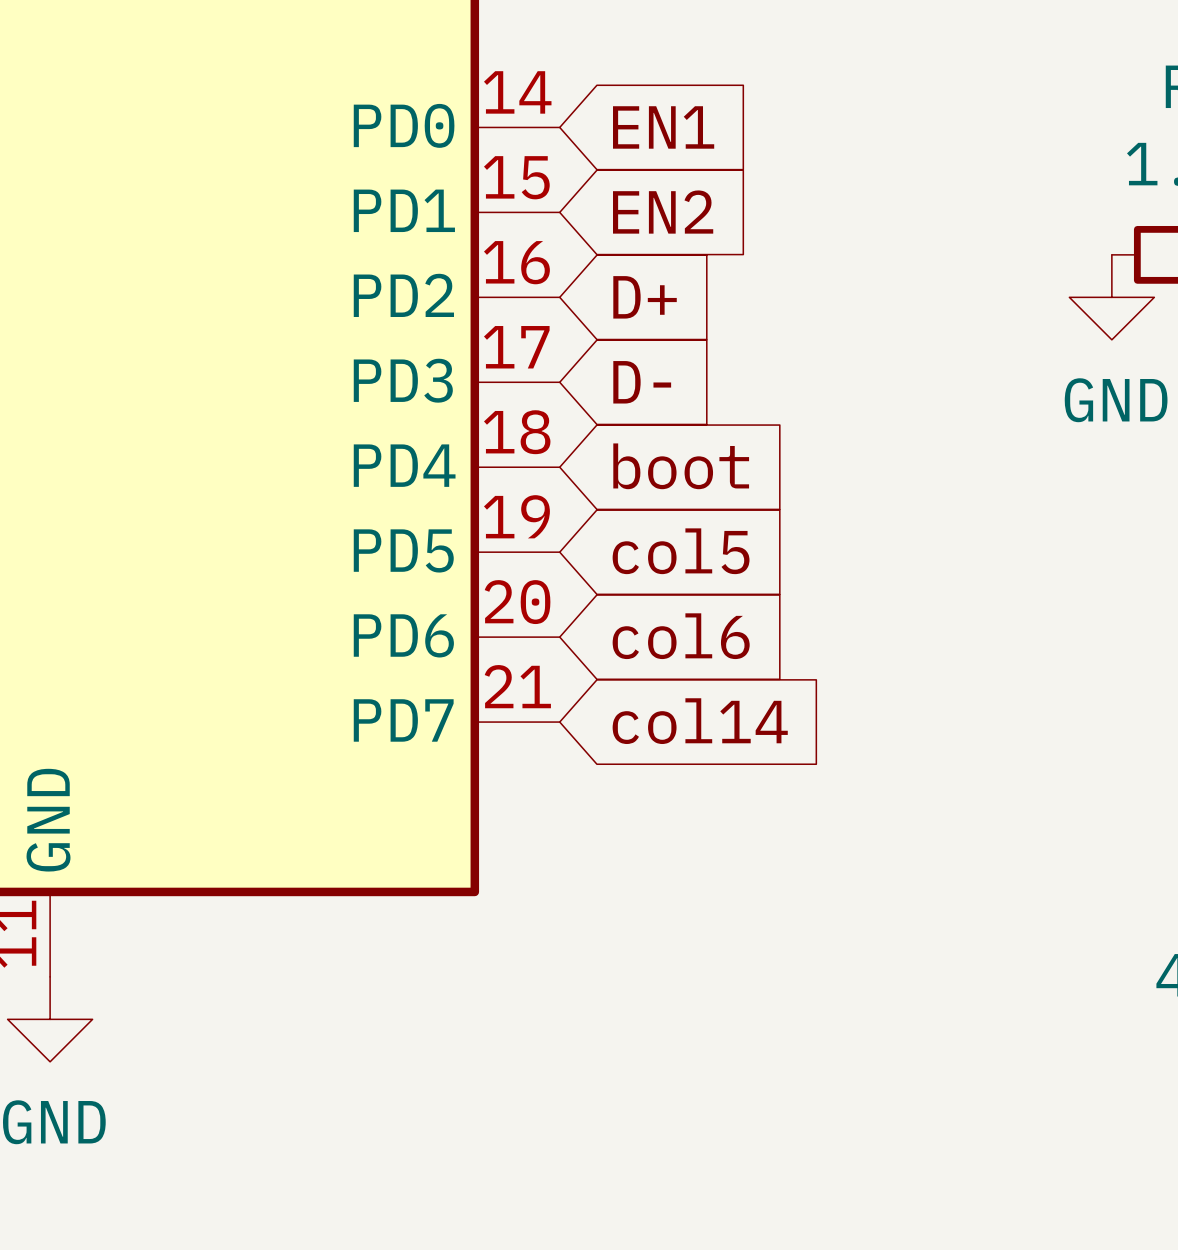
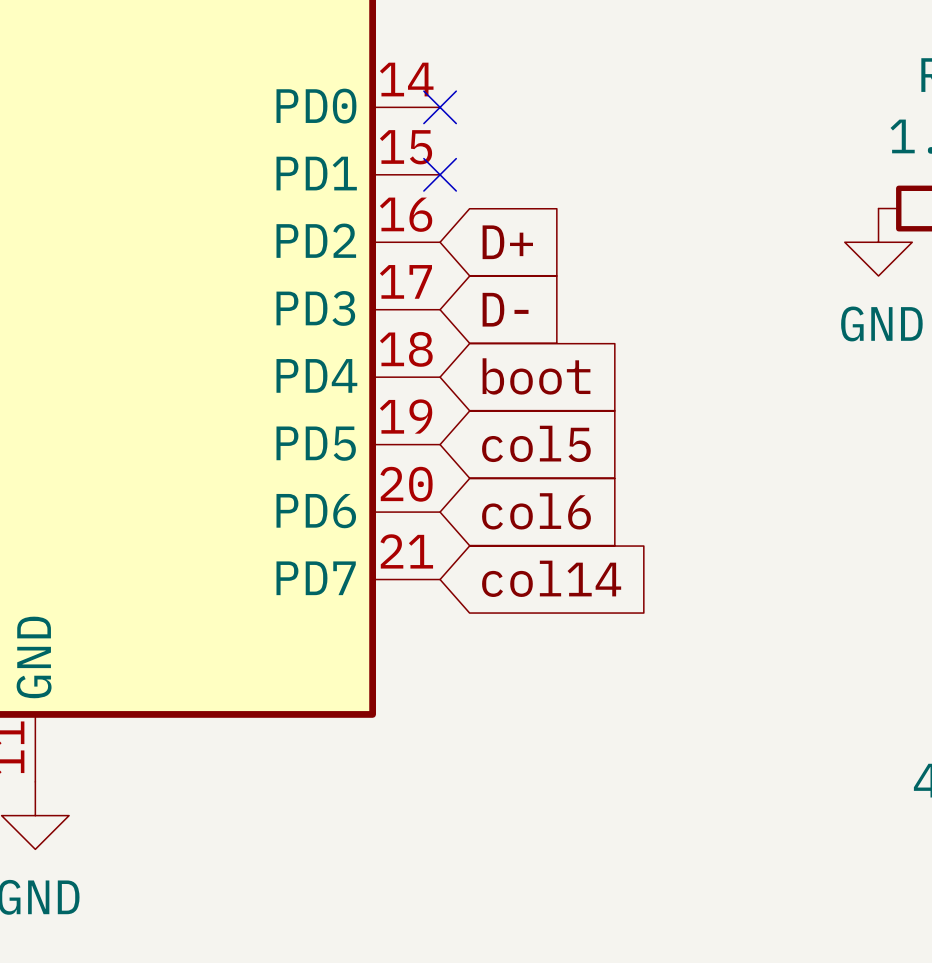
no-connect mark: none -> (440, 107)
global label: EN1 (663, 127) -> none
no-connect mark: none -> (440, 174)
global label: EN2 (663, 212) -> none

